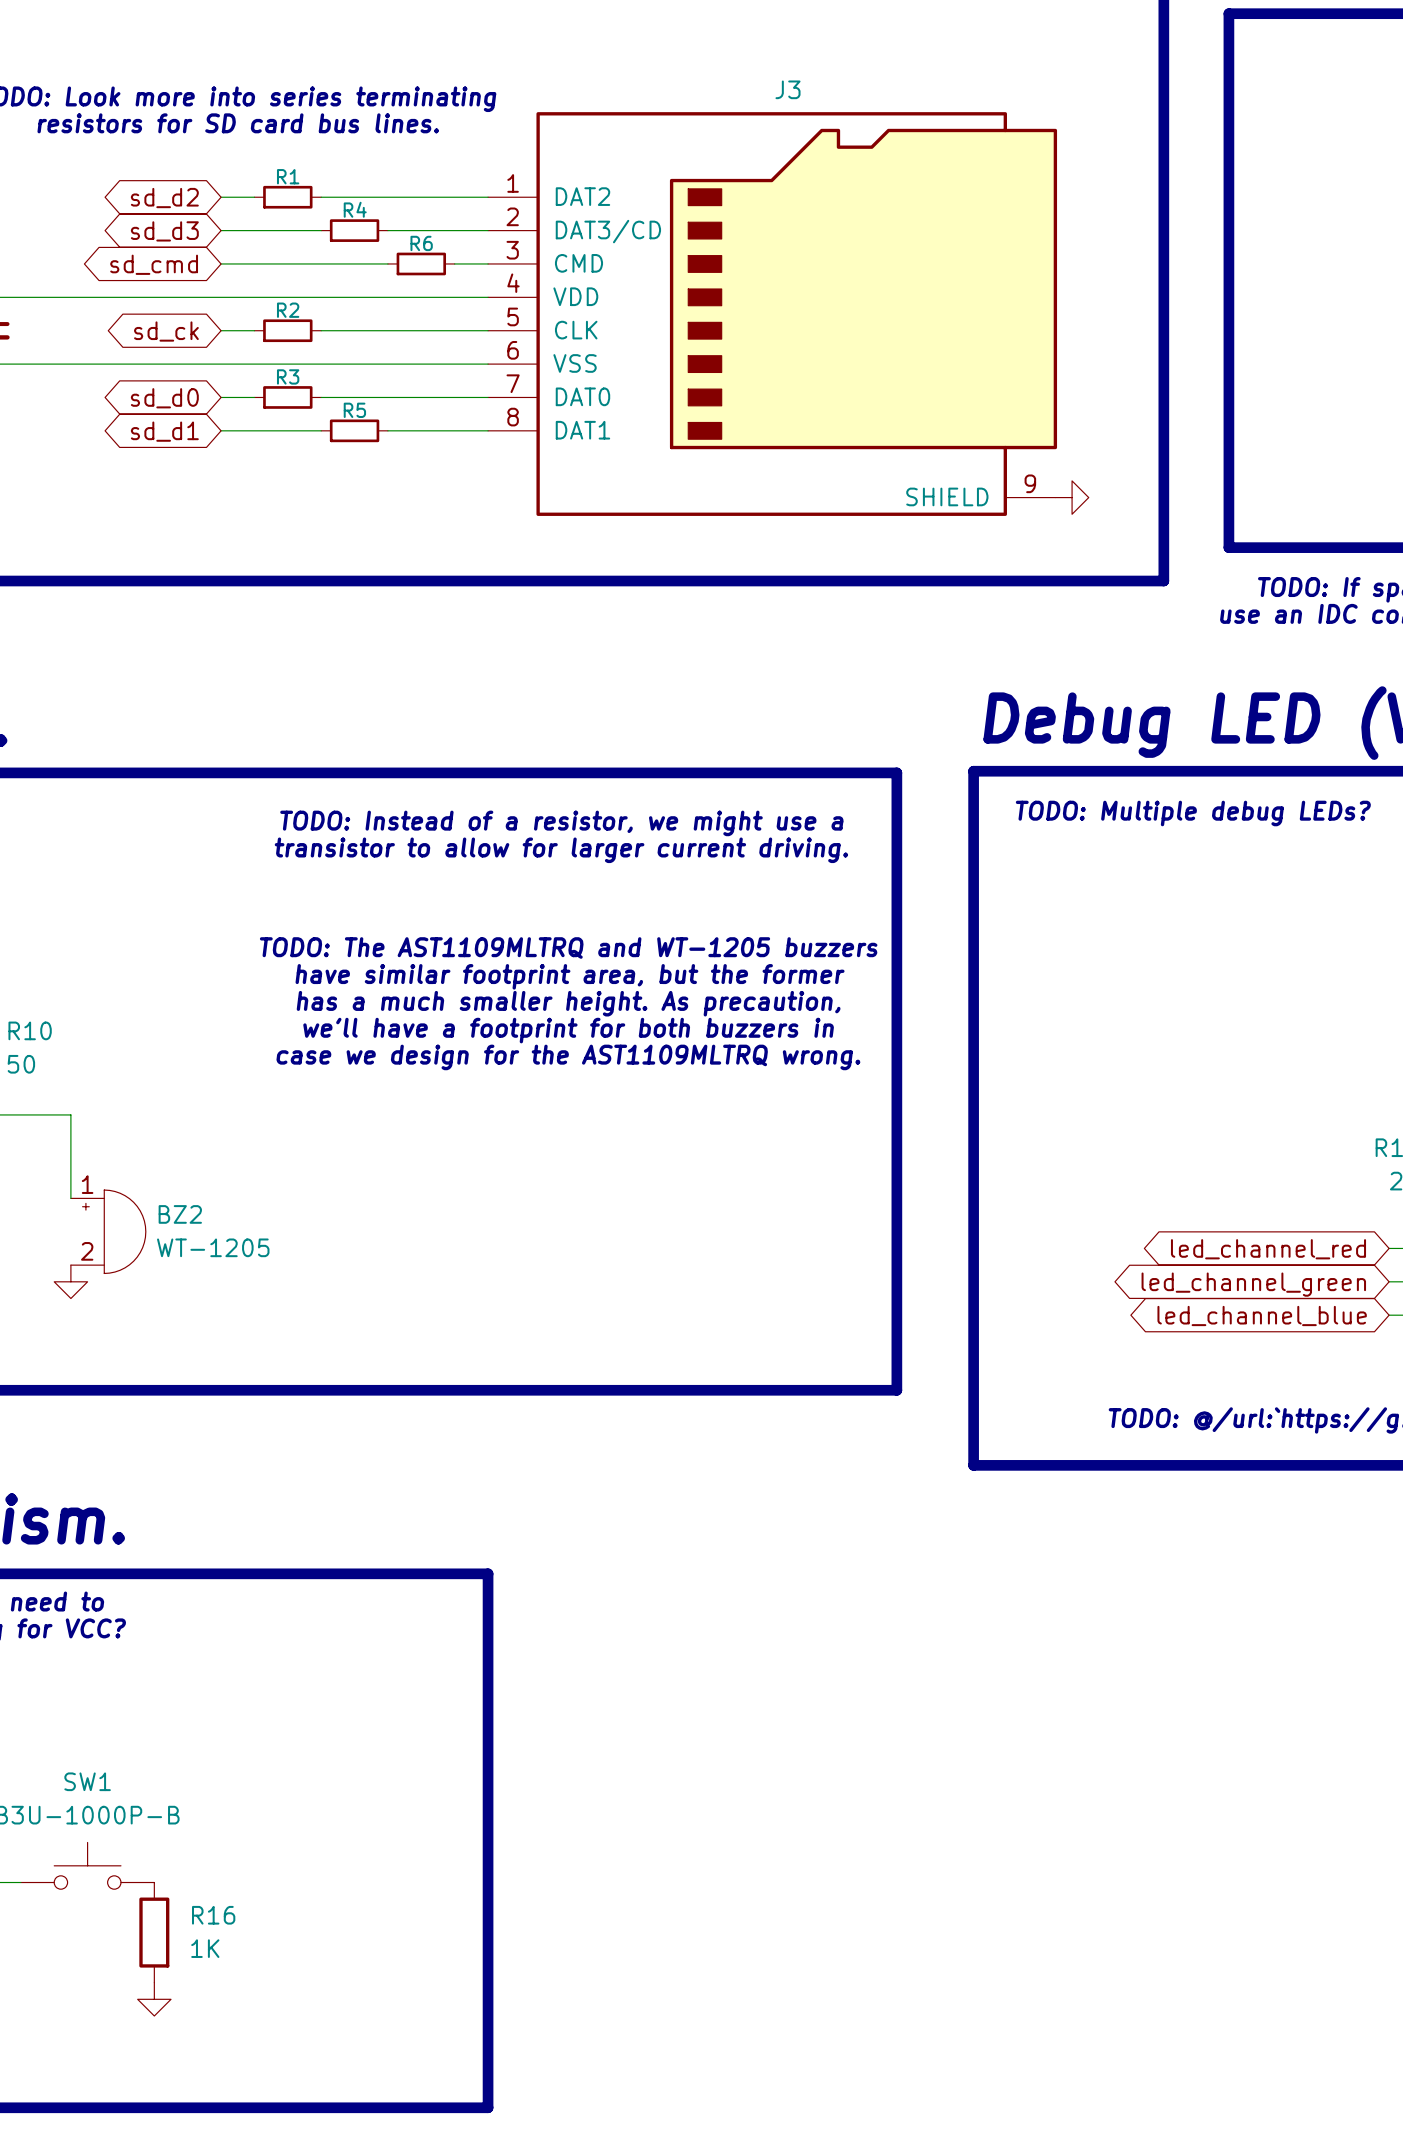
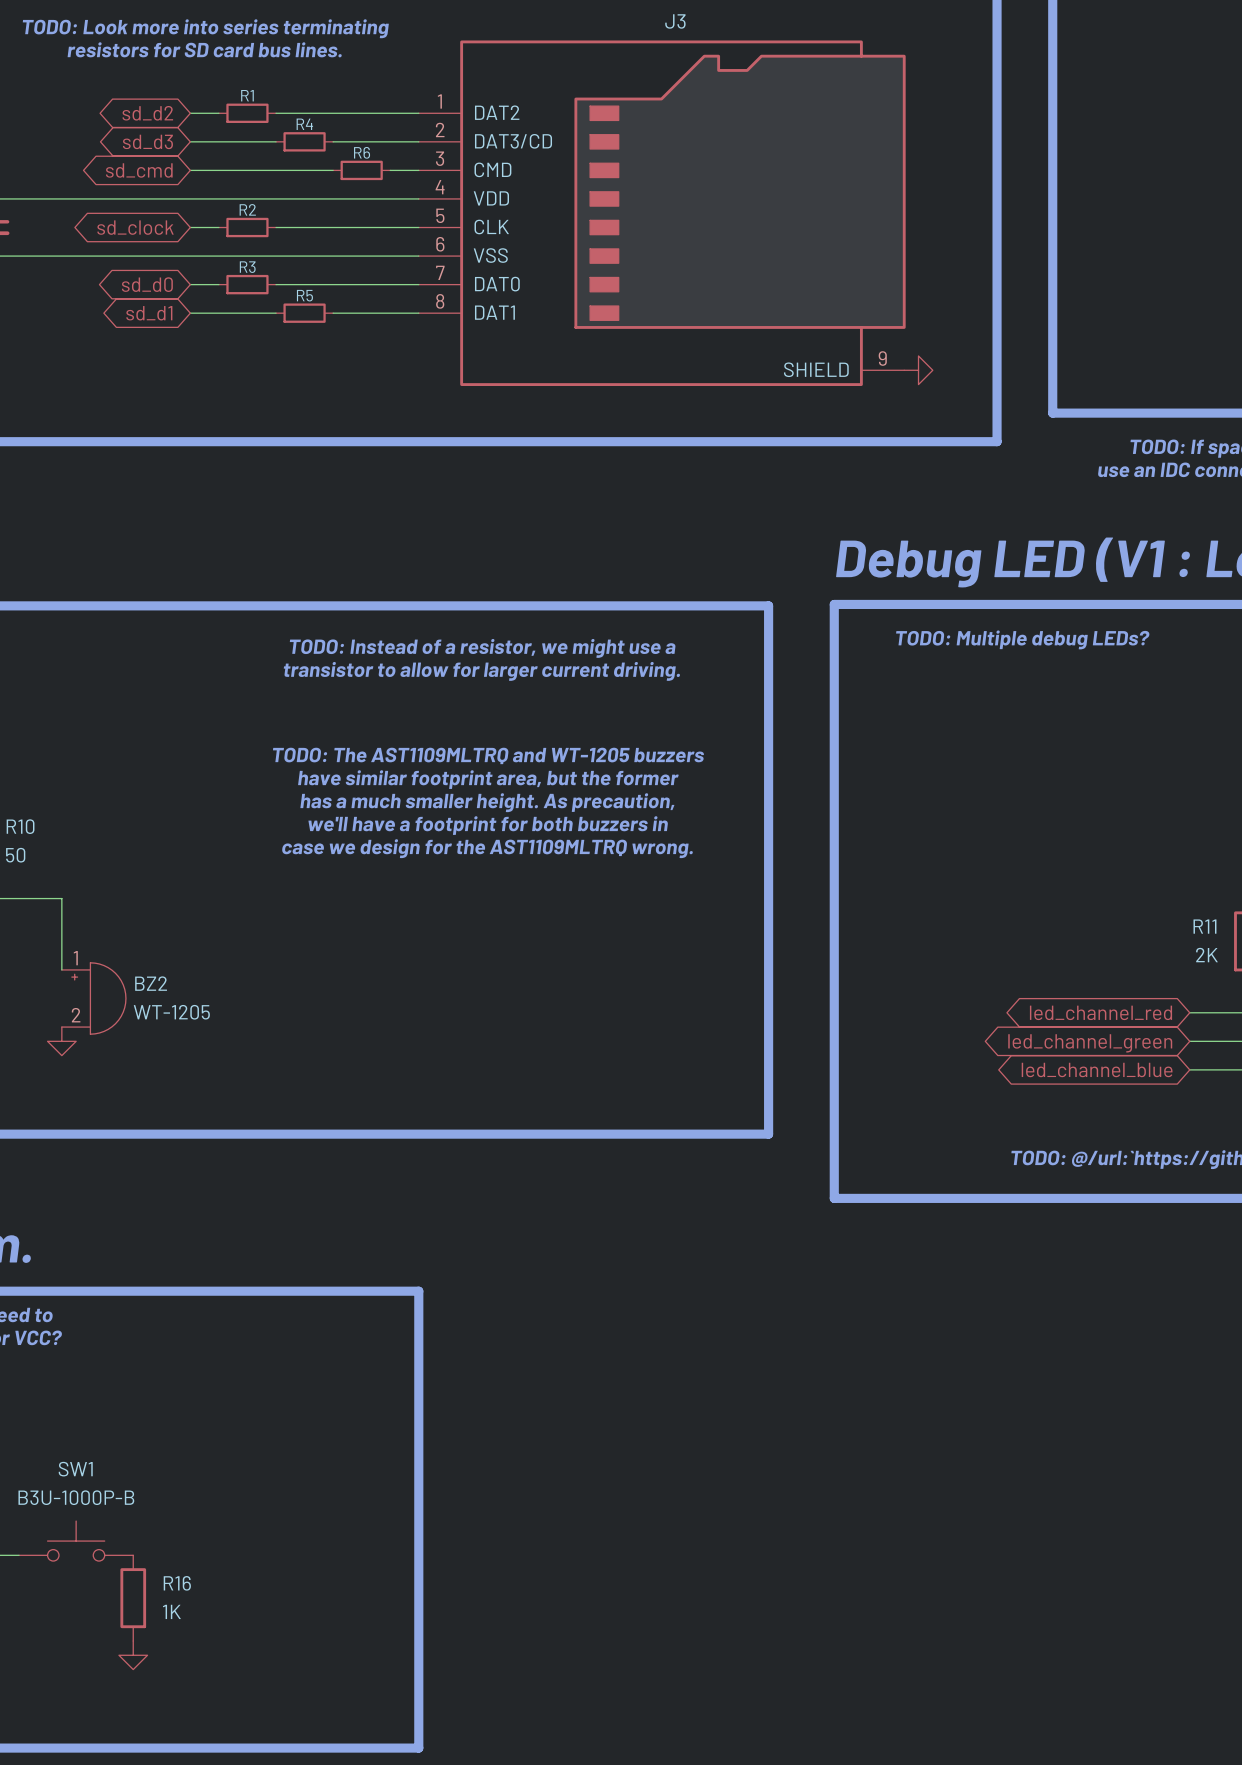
global label: sd_ck (166, 331) -> sd_clock (135, 227)

